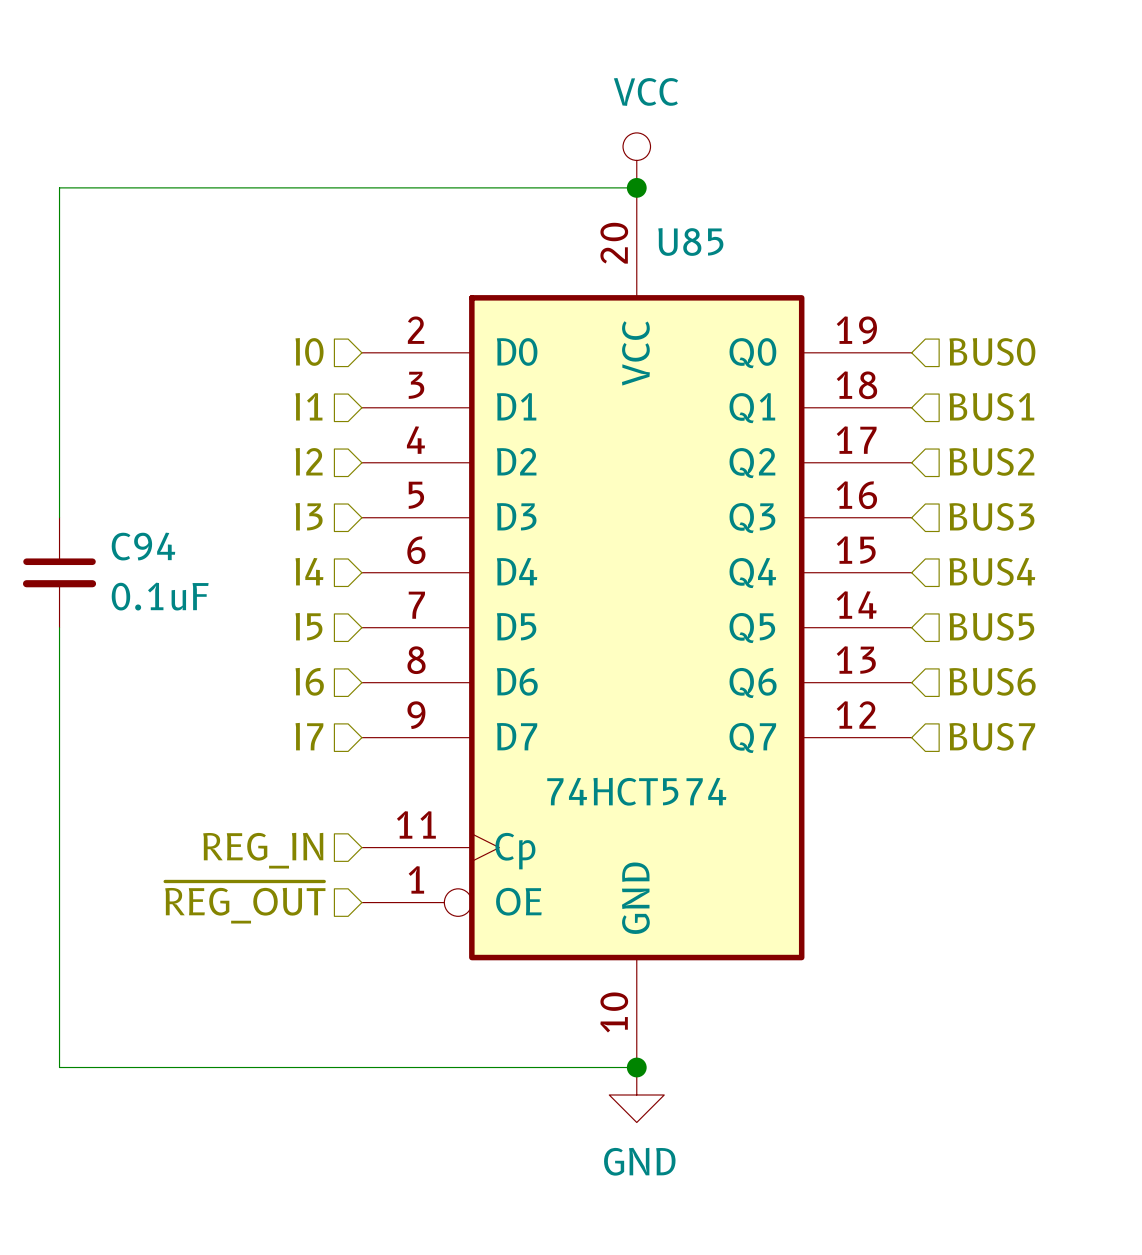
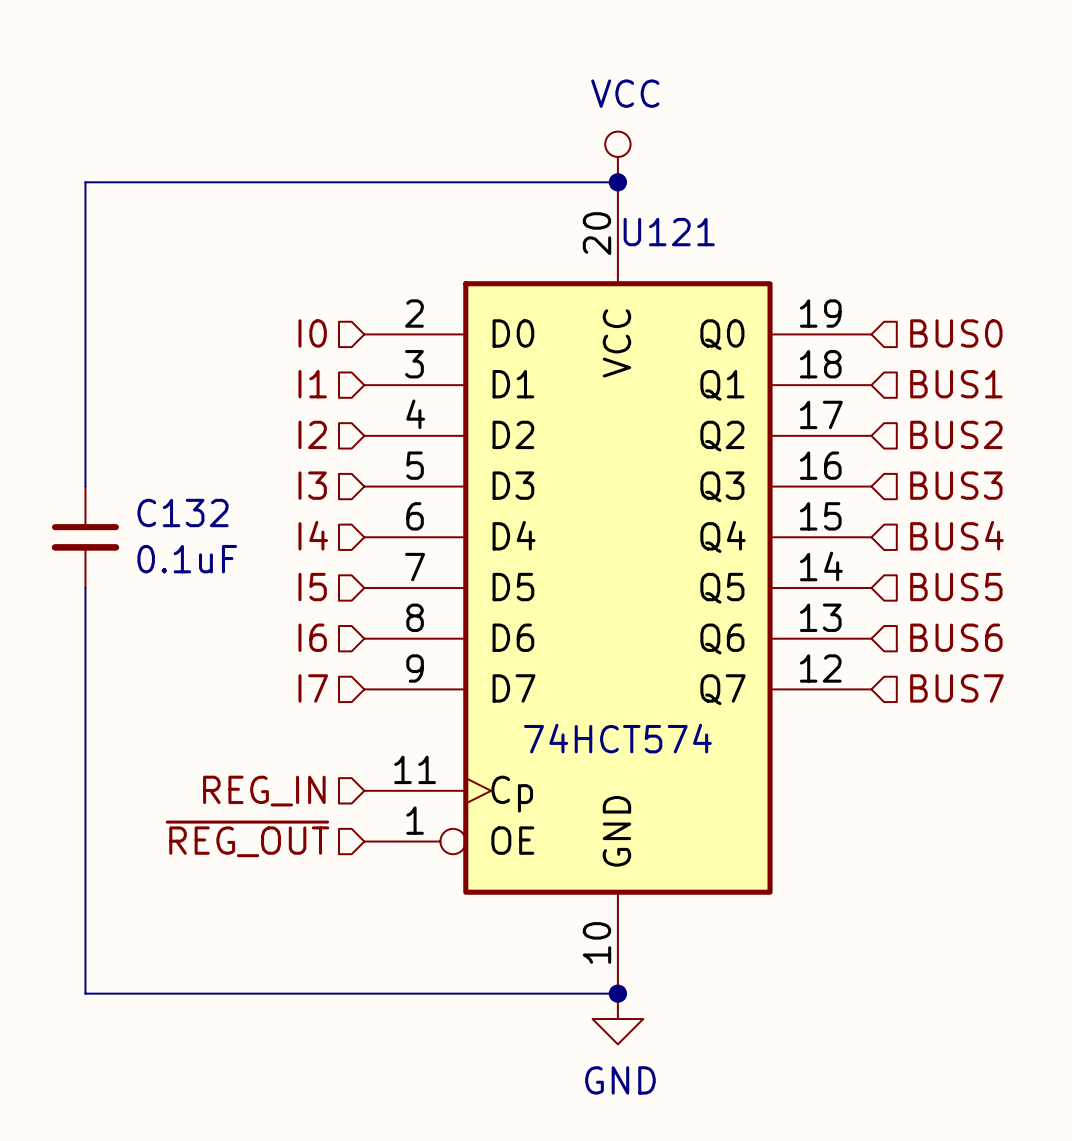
U85 name: U85 (690, 241) -> U121 (669, 232)
C94 name: C94 (143, 546) -> C132 (183, 512)

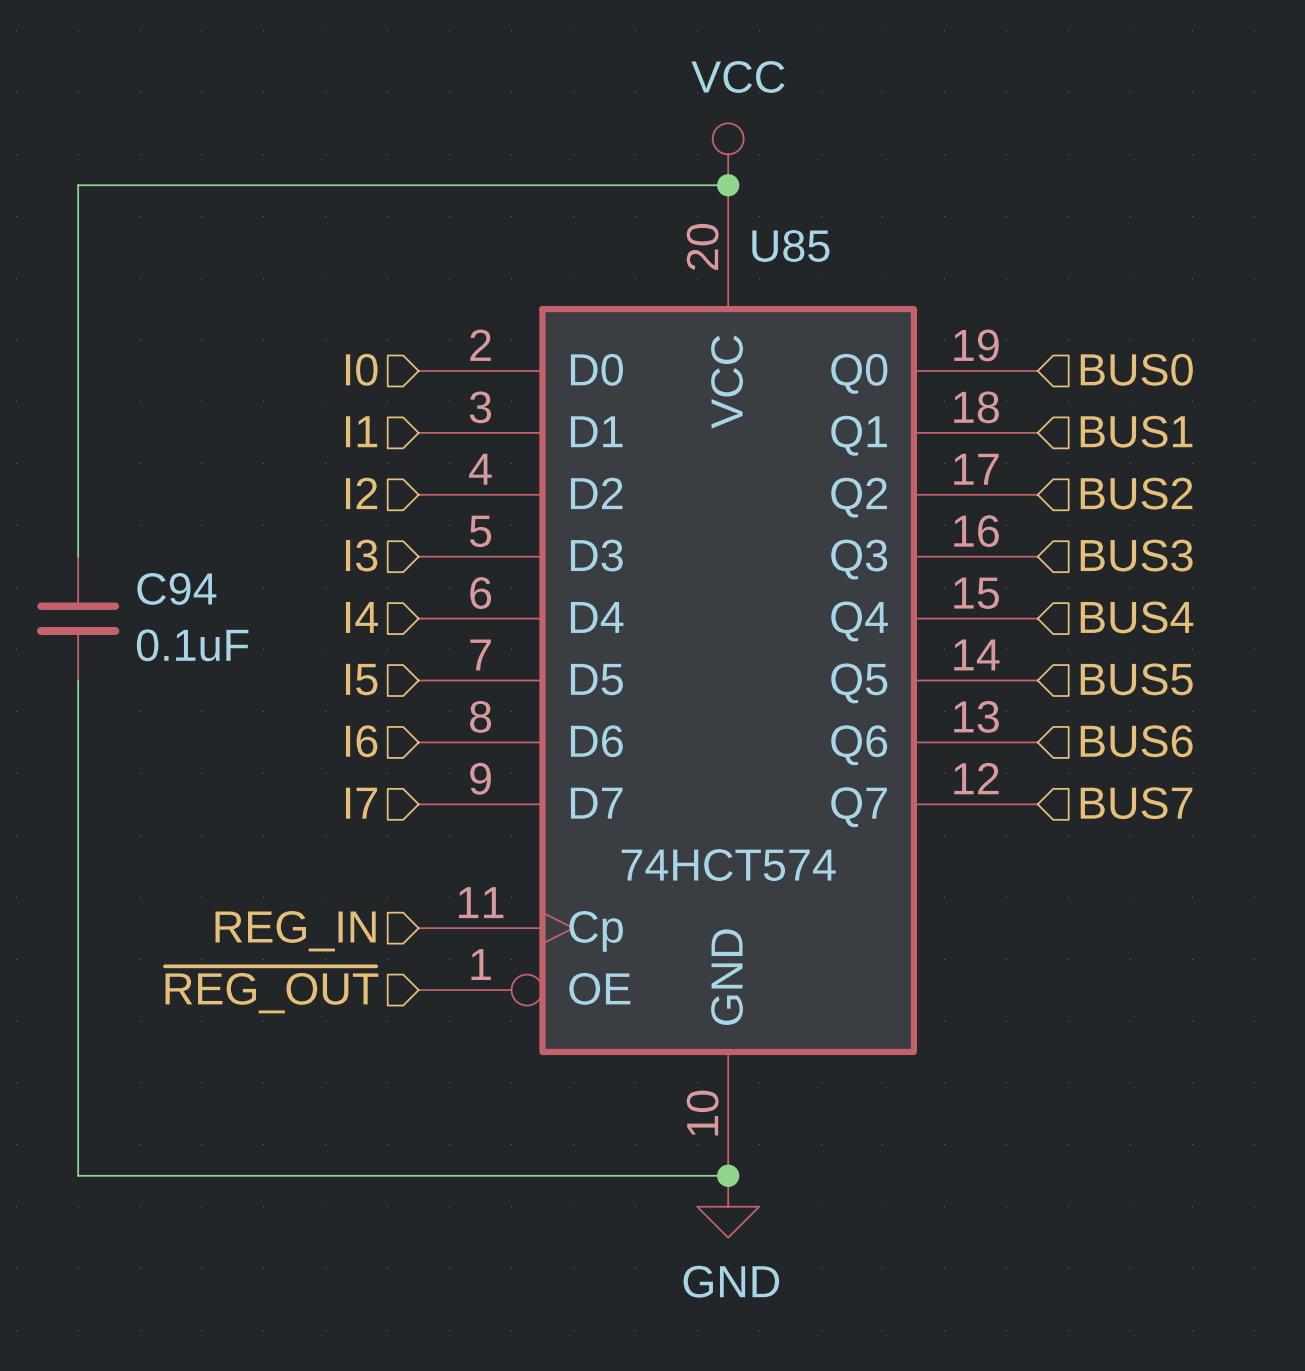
U121 name: U121 (669, 232) -> U85 (790, 245)
C132 name: C132 (183, 512) -> C94 (176, 588)

